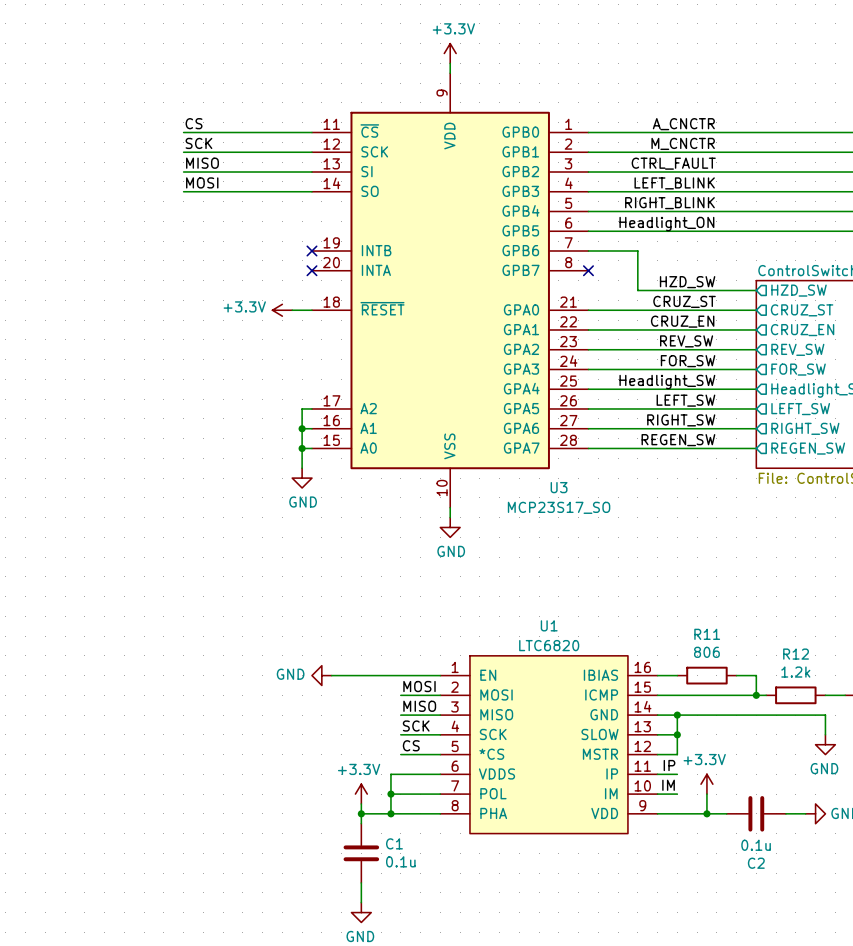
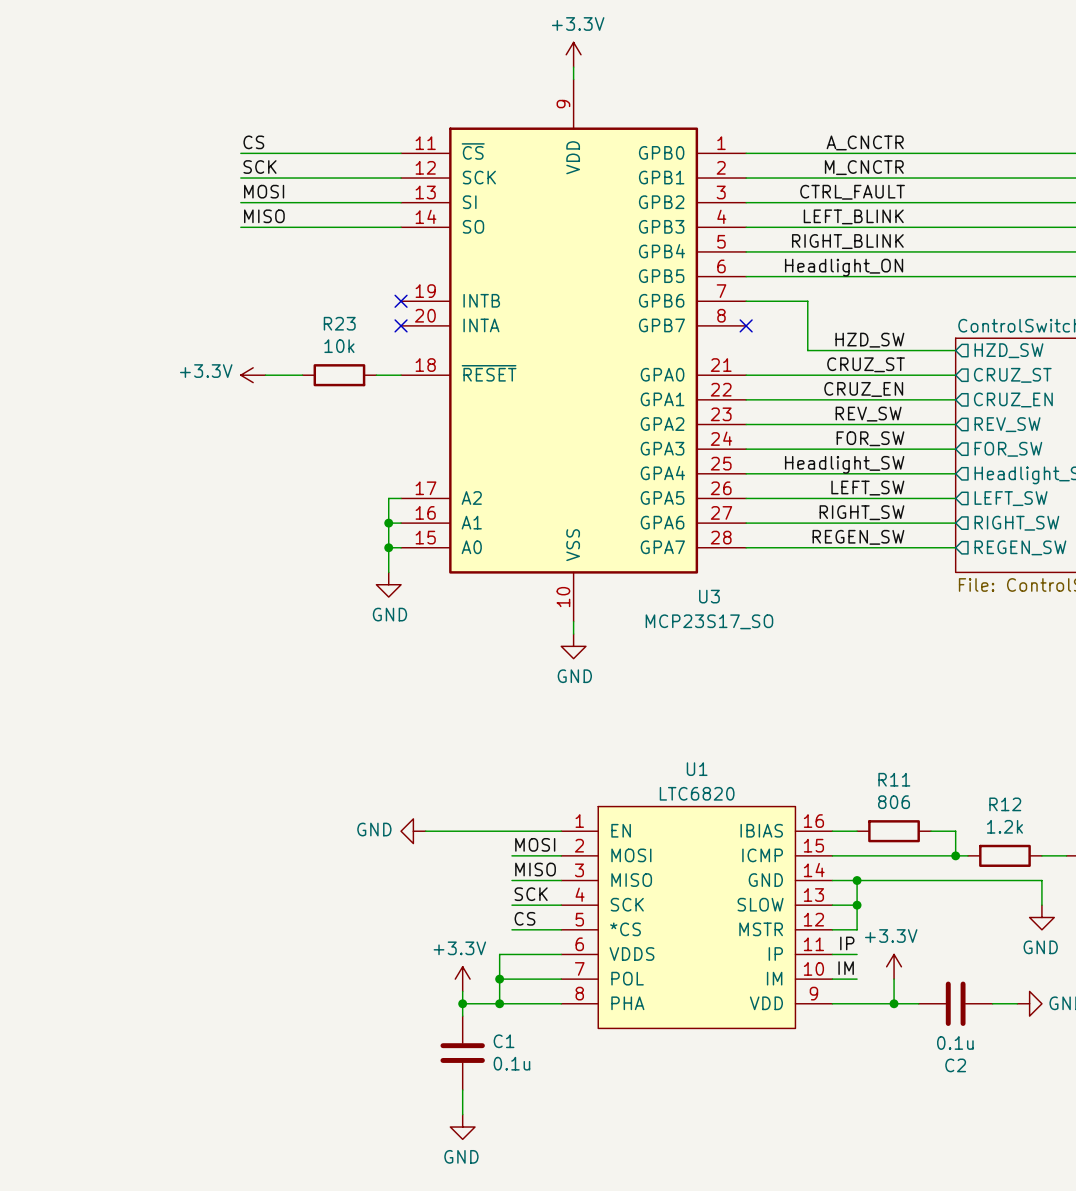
label: MISO (202, 163) -> MOSI (264, 191)
label: MOSI (202, 182) -> MISO (264, 216)
wire: none -> (265, 375) (302, 375)
R23: none -> 10k (339, 375)
power symbol position: +3.3V (282, 310) -> +3.3V (253, 375)

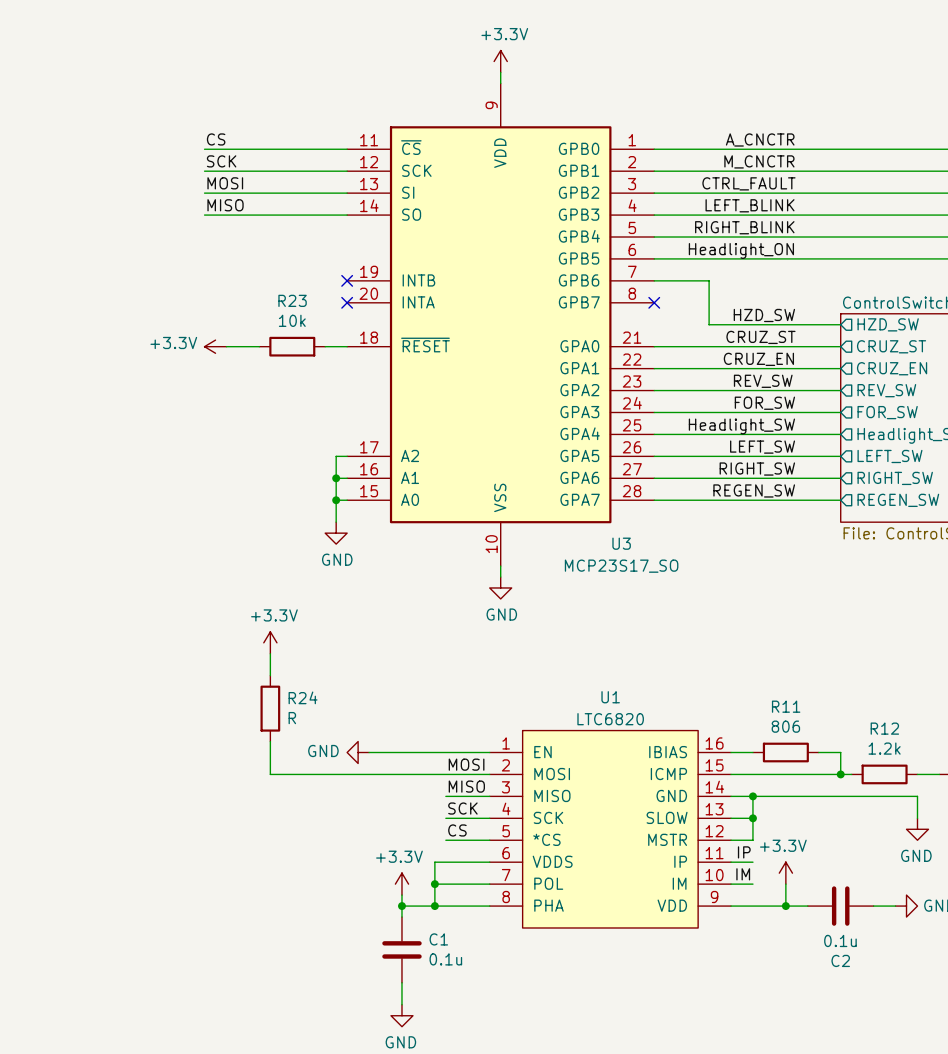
power symbol: none -> +3.3V (270, 642)
wire: none -> (270, 653) (270, 675)
R24: none -> R (270, 708)
wire: none -> (270, 741) (270, 774) (445, 774)

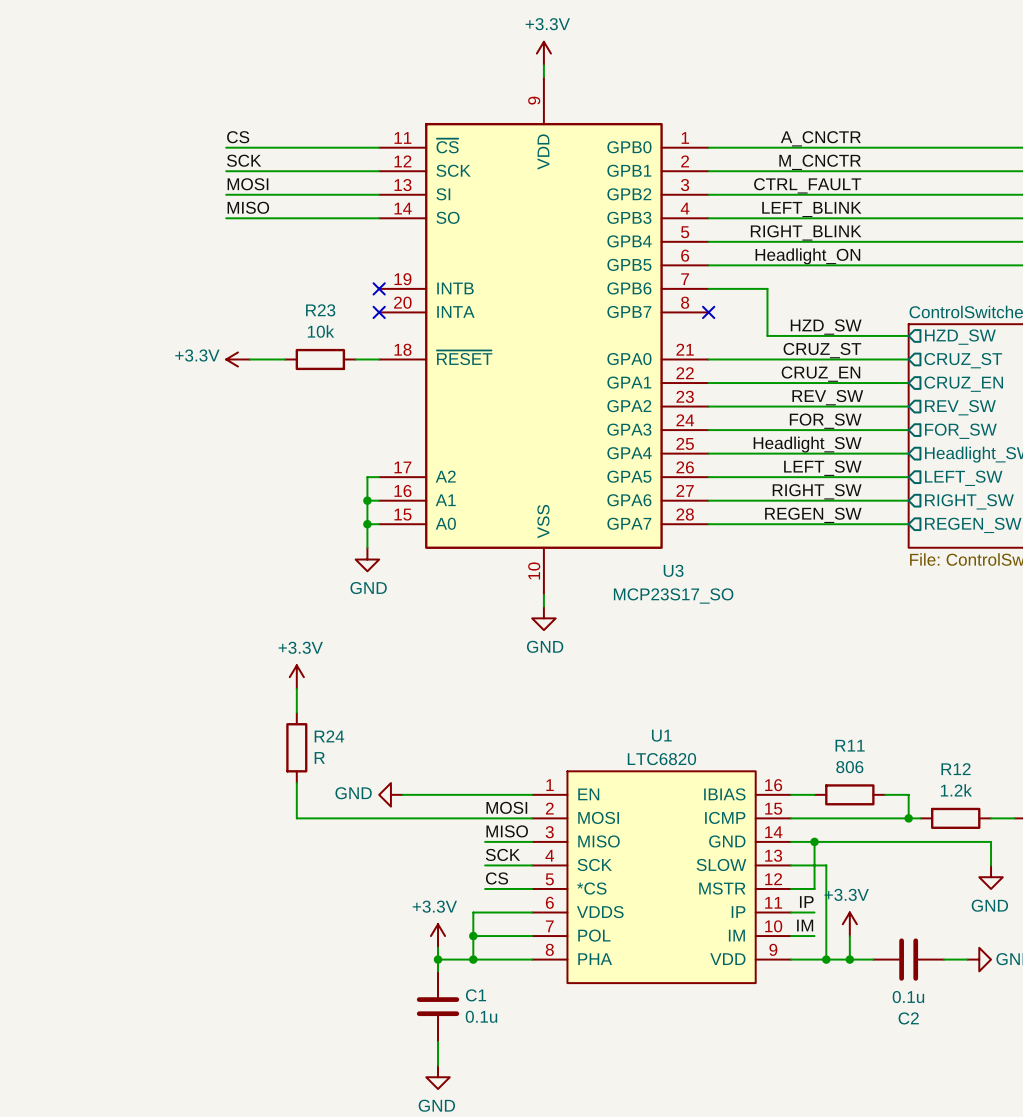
wire: none -> (814, 865) (826, 865) (826, 959)
junction: (752, 818) -> none
junction: none -> (826, 959)

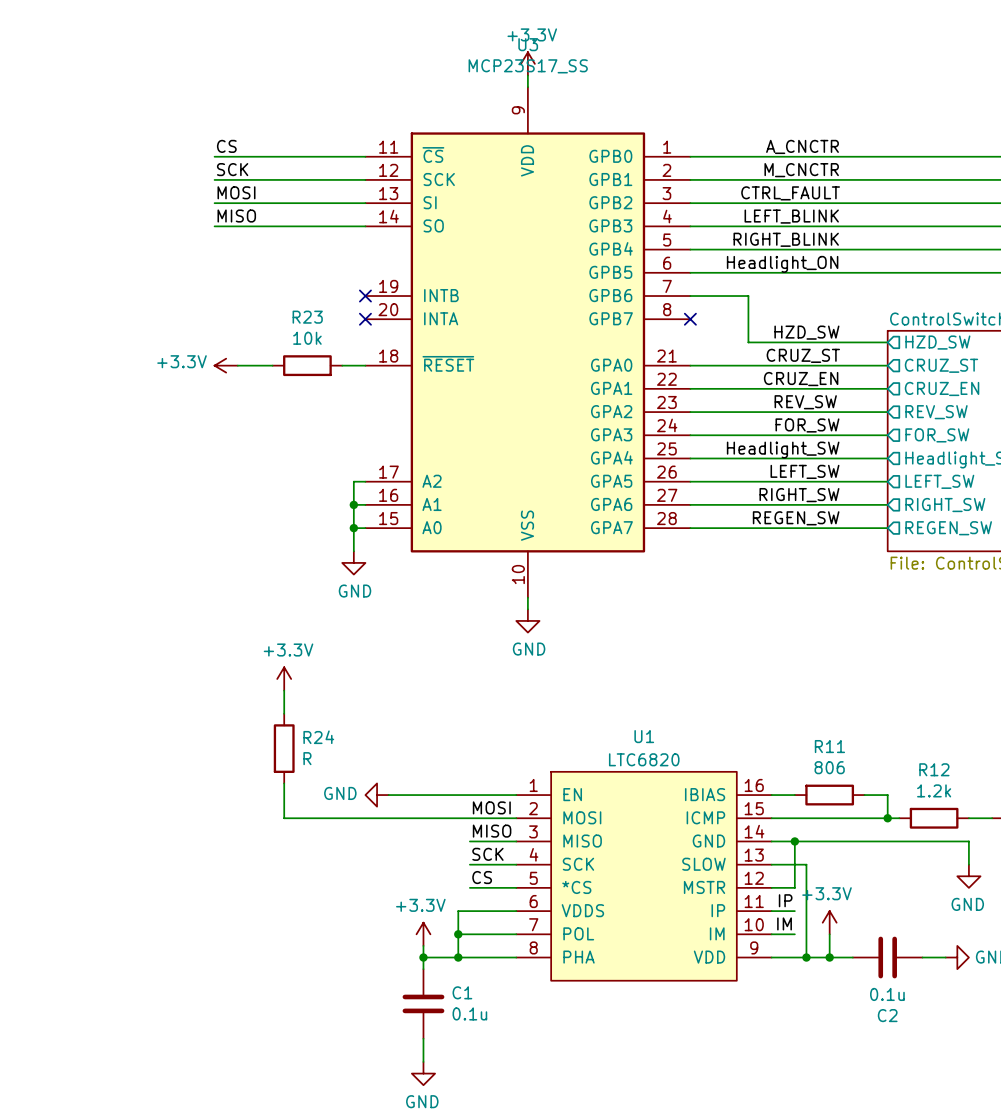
U3 name position: U3 (673, 570) -> U3 (528, 44)
U3 value: MCP23S17_SO (673, 595) -> MCP23S17_SS (528, 66)

